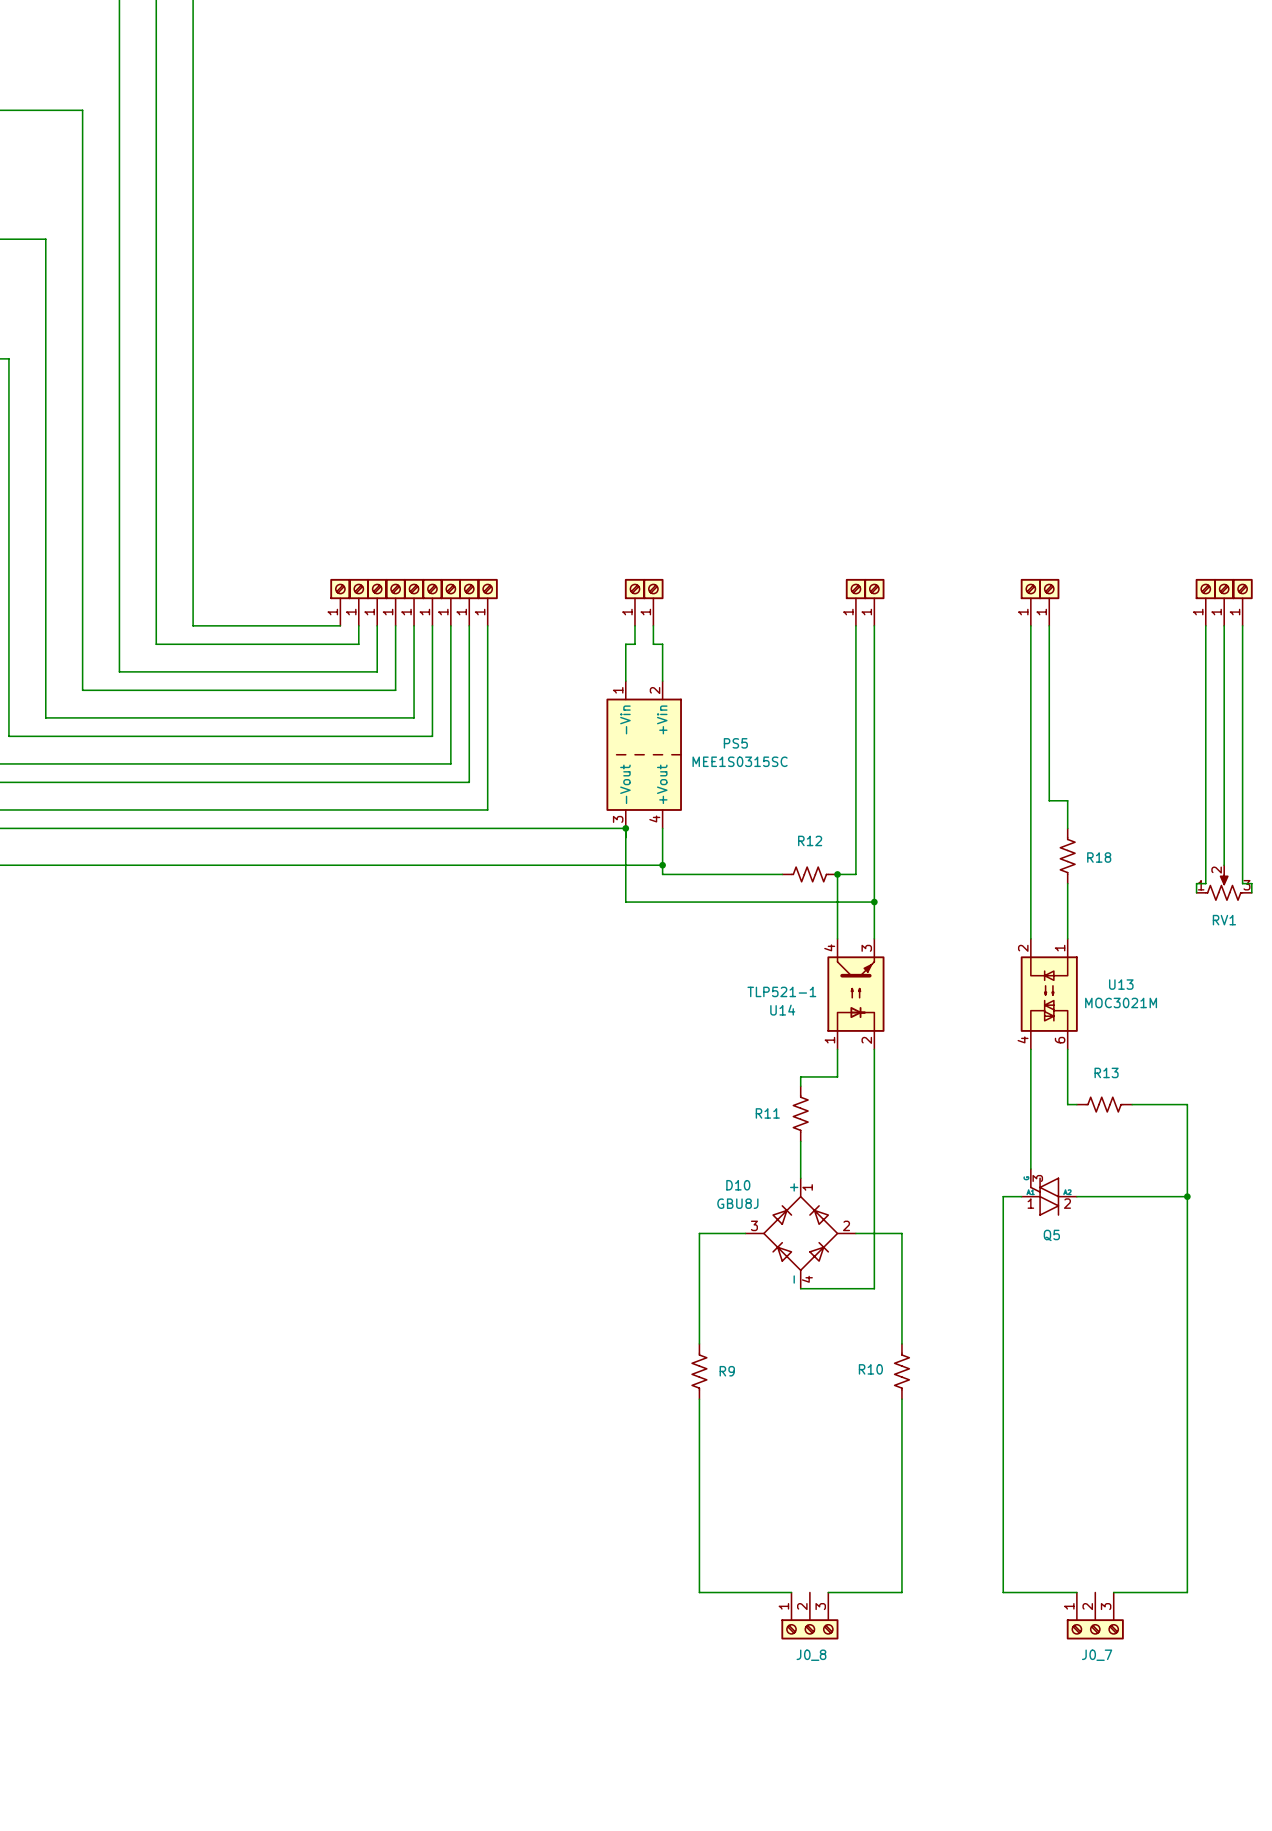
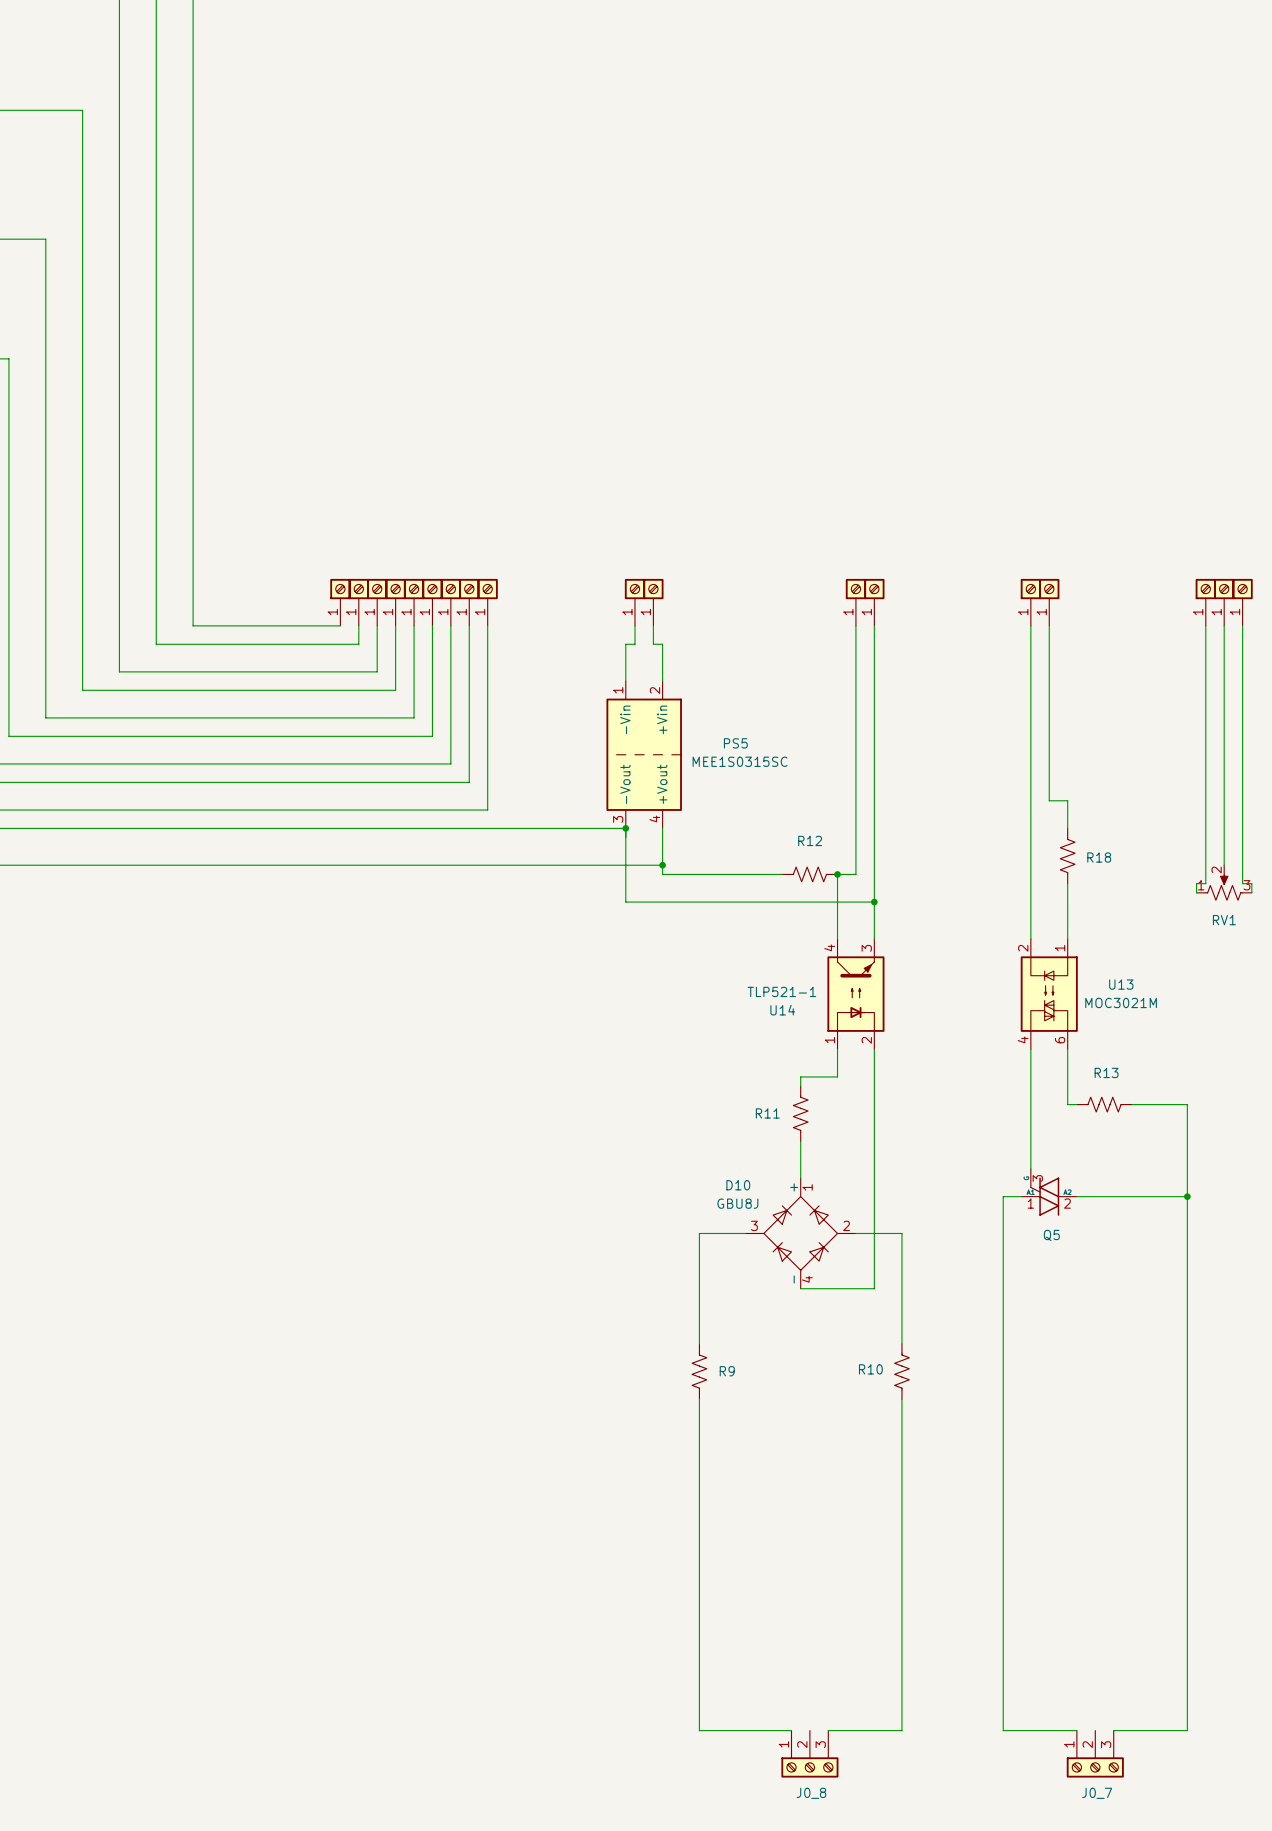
wire: (699, 1592) (791, 1592) -> (699, 1592) (699, 1730) (791, 1730)
wire: (828, 1592) (901, 1592) -> (828, 1730) (901, 1730) (901, 1592)
wire: (1003, 1592) (1076, 1592) -> (1003, 1592) (1003, 1730) (1076, 1730)
wire: (1113, 1592) (1187, 1592) -> (1113, 1730) (1187, 1730) (1187, 1592)
J0_8 position: (809, 1616) -> (809, 1754)
J0_7 position: (1095, 1616) -> (1095, 1754)

